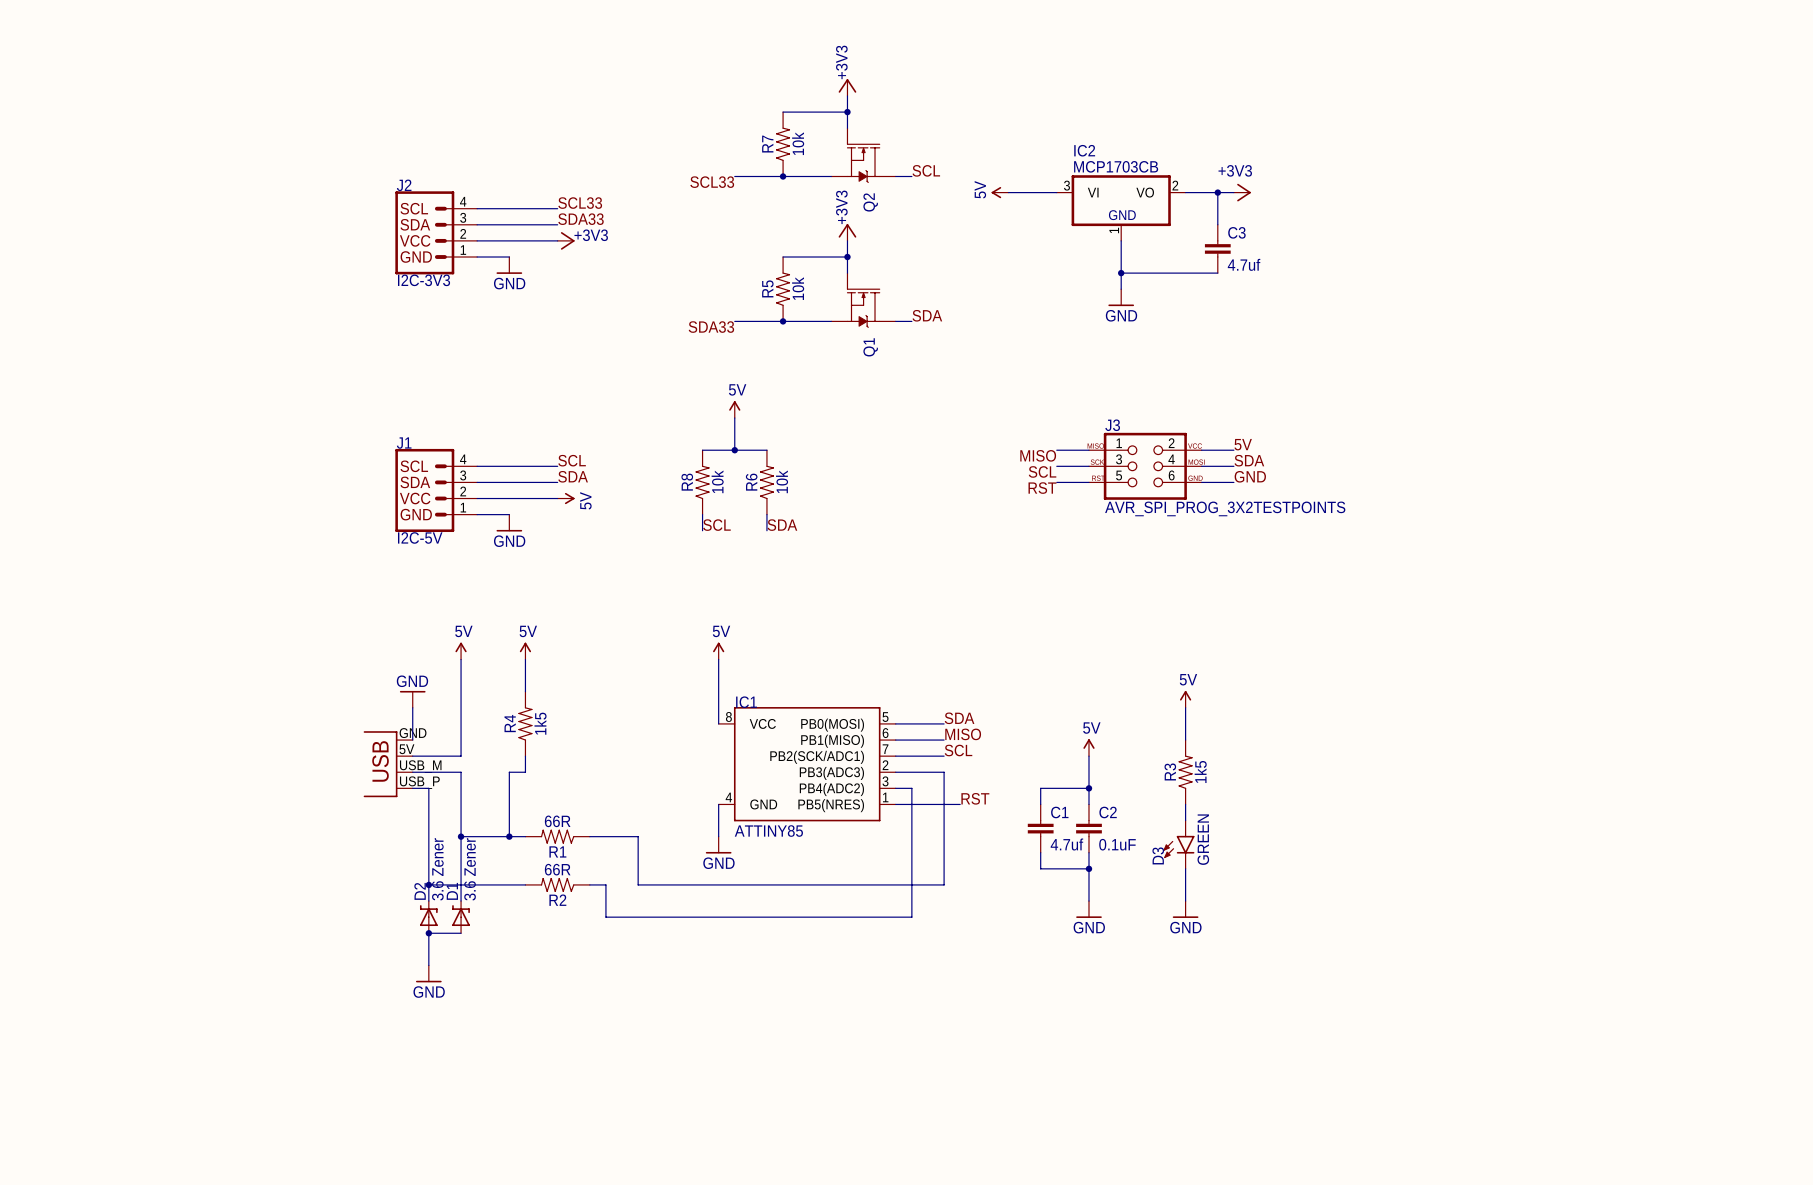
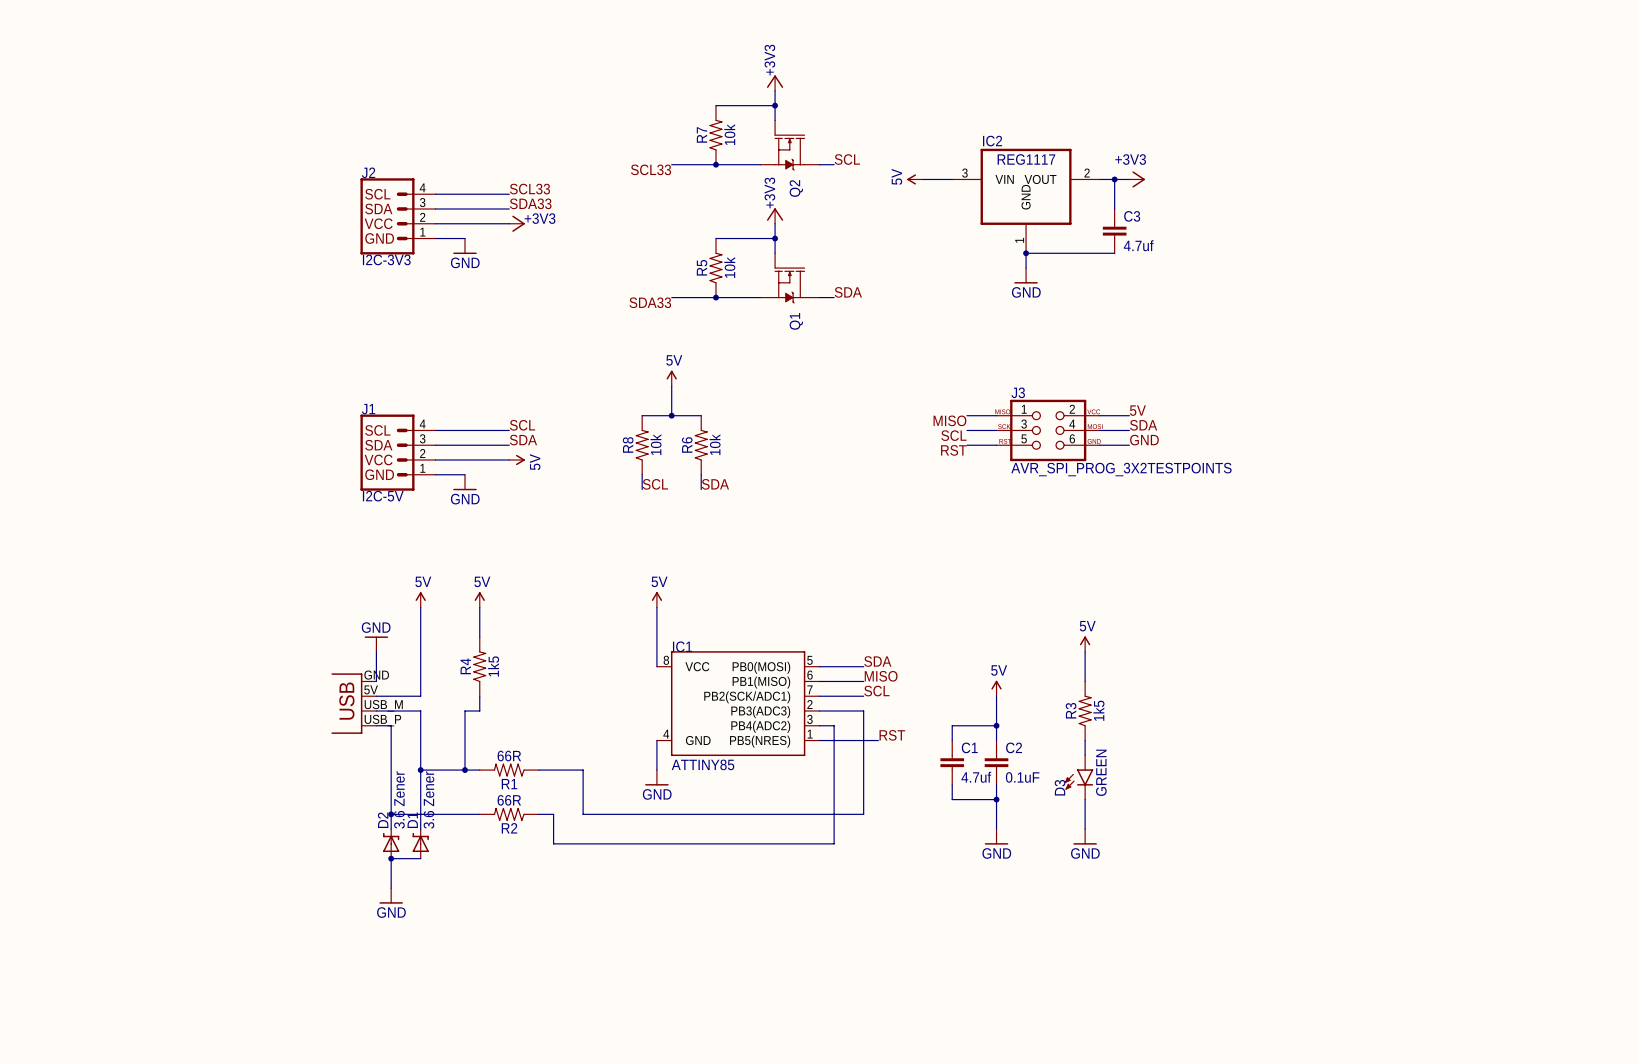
IC2 value: MCP1703CB (1116, 166) -> REG1117 (1026, 159)
IC2 symbol: [1056, 175, 1186, 241] -> [952, 148, 1100, 254]

